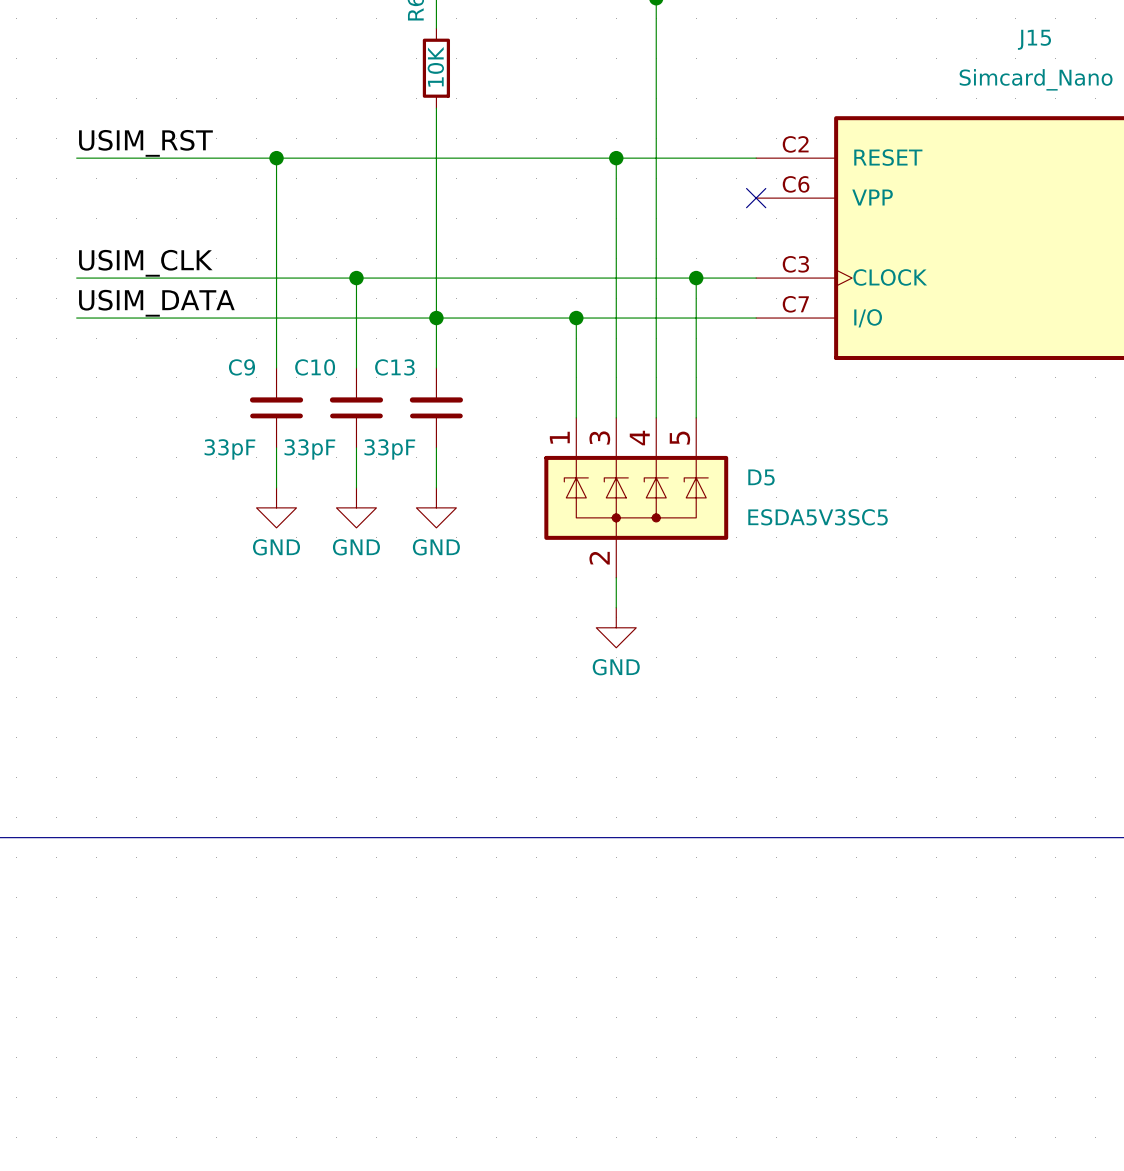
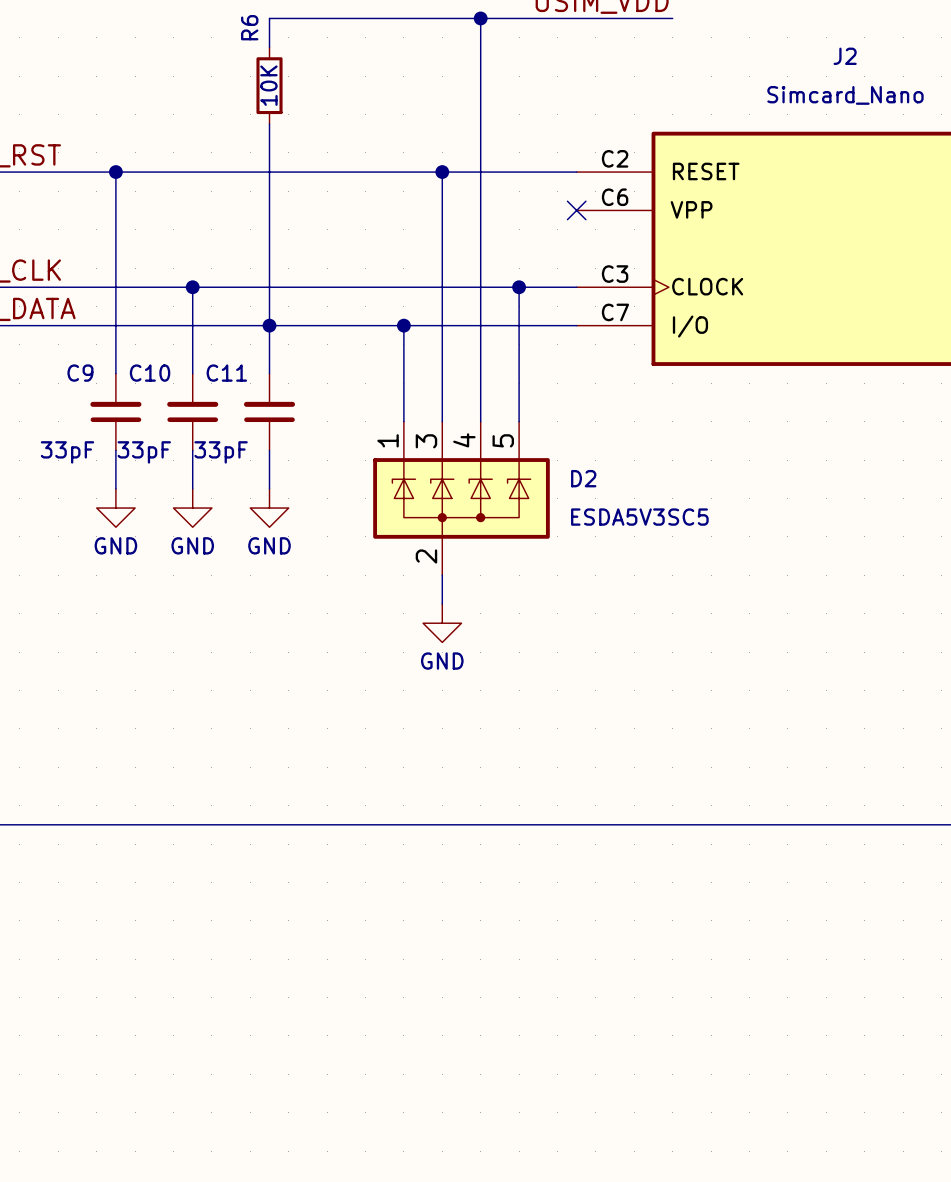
J15 name: J15 (1034, 39) -> J2 (845, 56)
C13 name: C13 (394, 367) -> C11 (226, 373)
D5 name: D5 (761, 477) -> D2 (583, 478)

